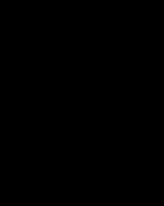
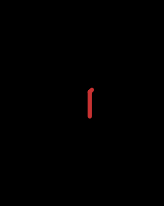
top track: none -> (91, 89) (89, 91) (89, 116)

